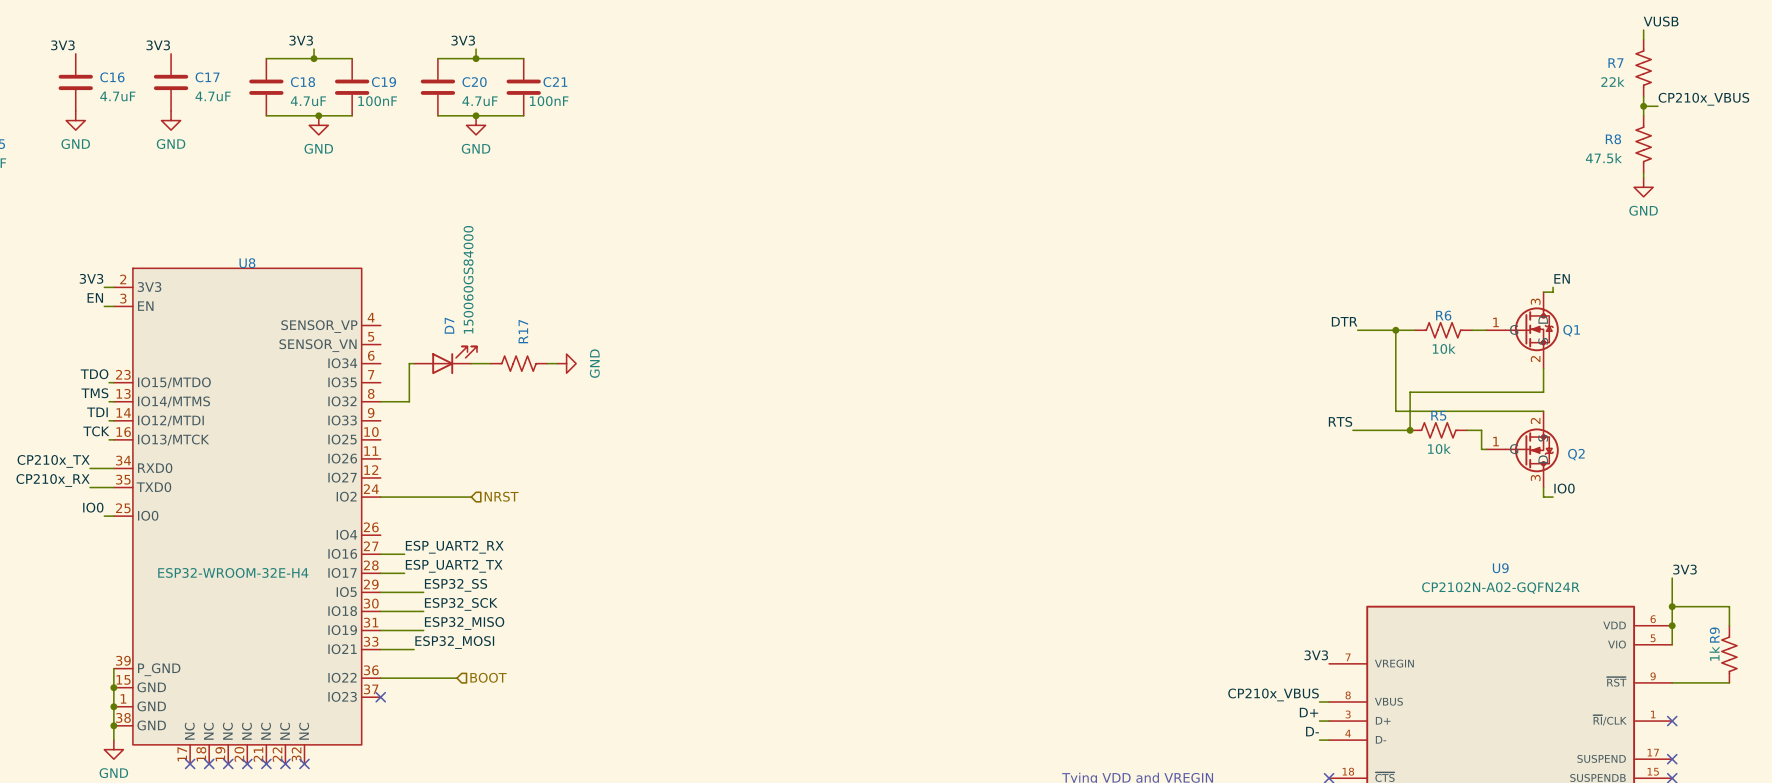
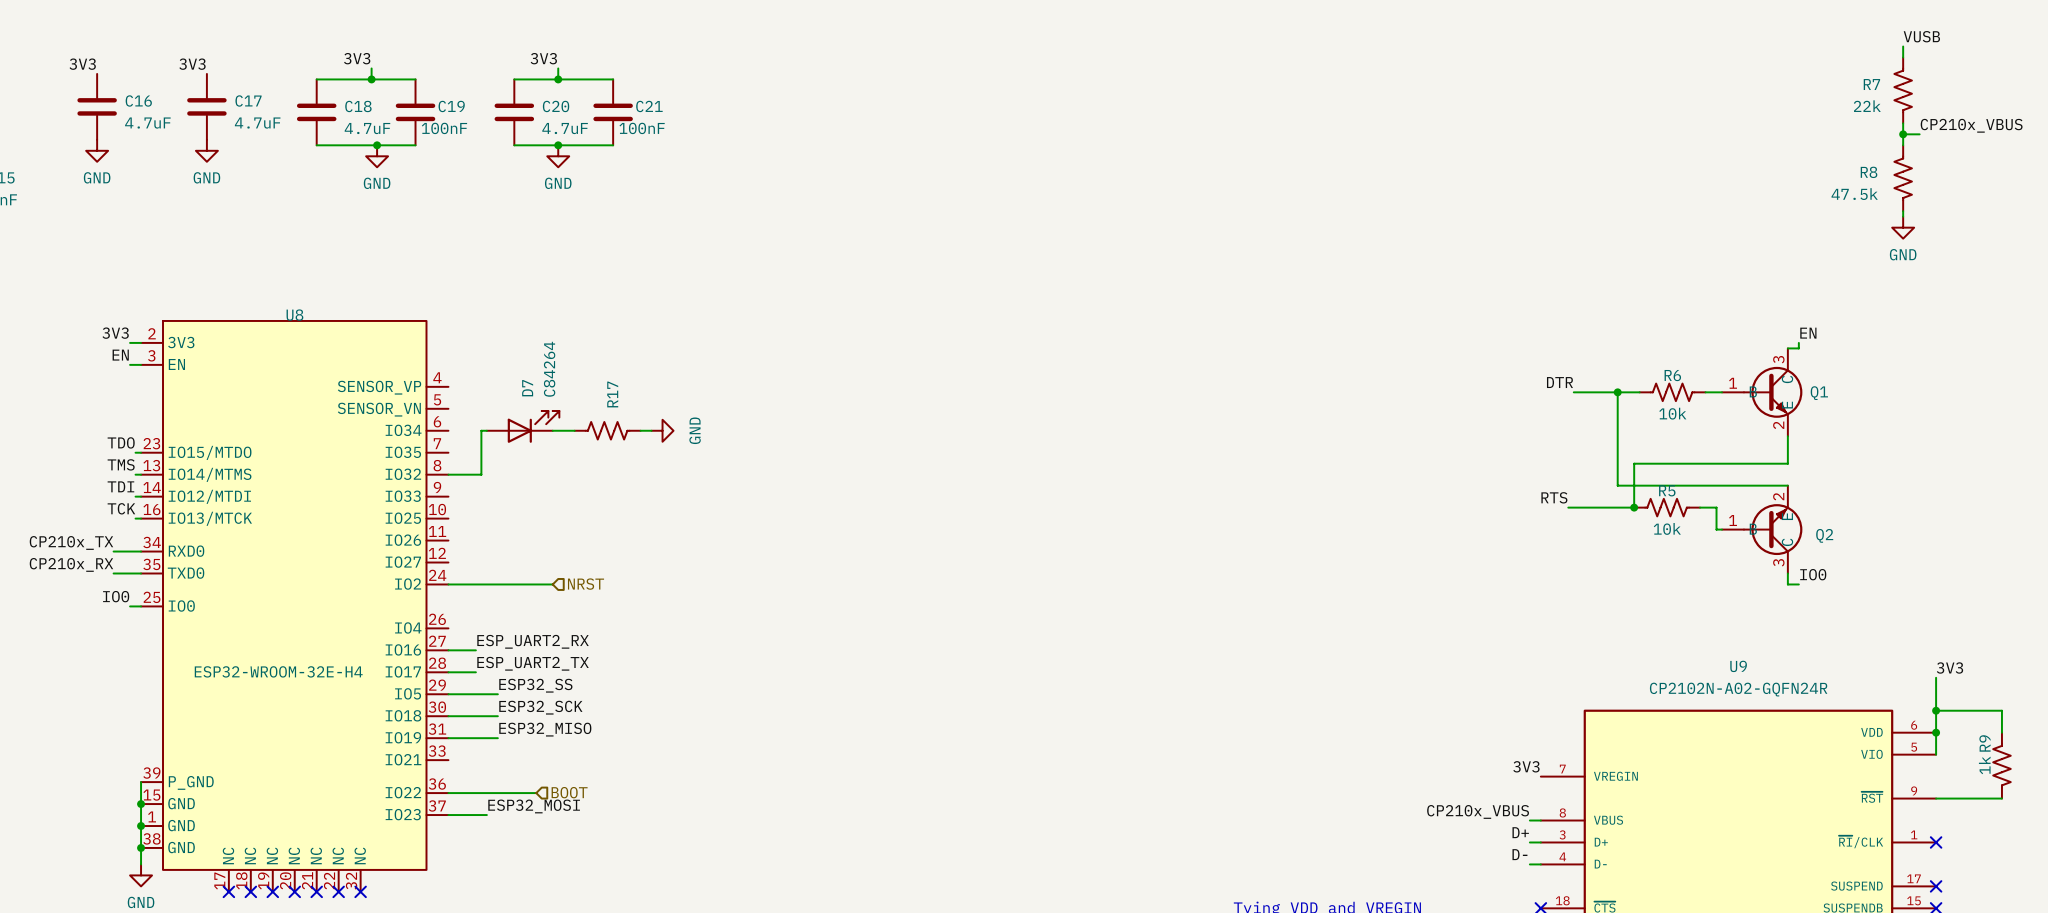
D7 value: 150060GS84000 (468, 279) -> C84264 (549, 369)
Q1 symbol: [1486, 292, 1559, 369] -> [1722, 348, 1803, 437]
Q2 symbol: [1486, 411, 1559, 488] -> [1722, 485, 1803, 574]
label position: ESP32_MOSI (454, 642) -> ESP32_MOSI (534, 806)
wire: (380, 649) (414, 649) -> (448, 815) (486, 815)
no-connect mark: (380, 697) -> none

